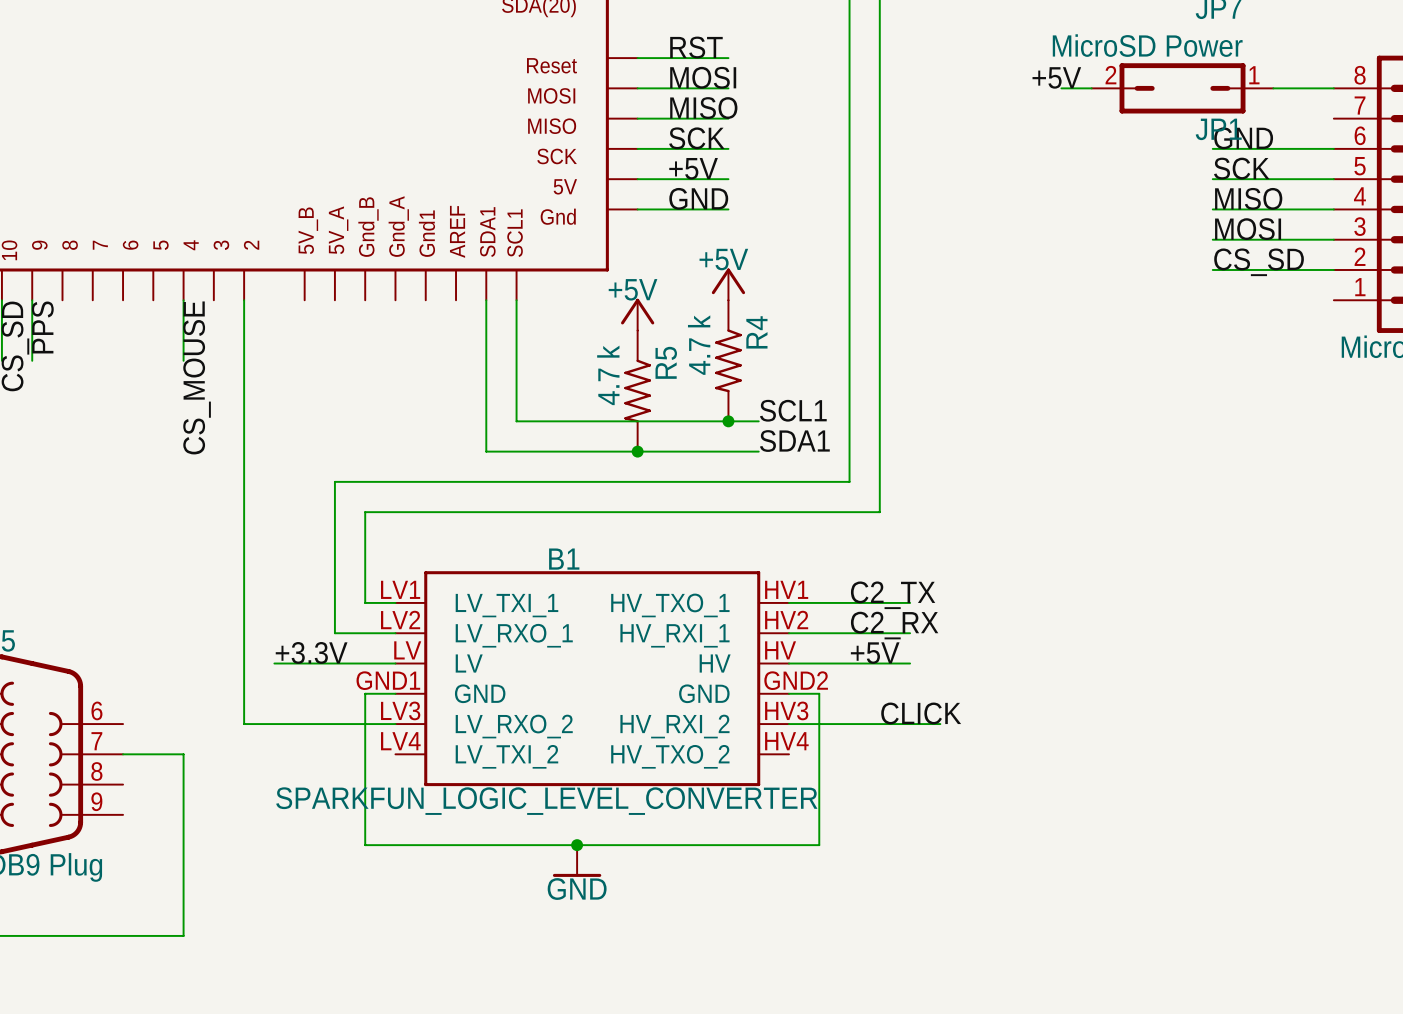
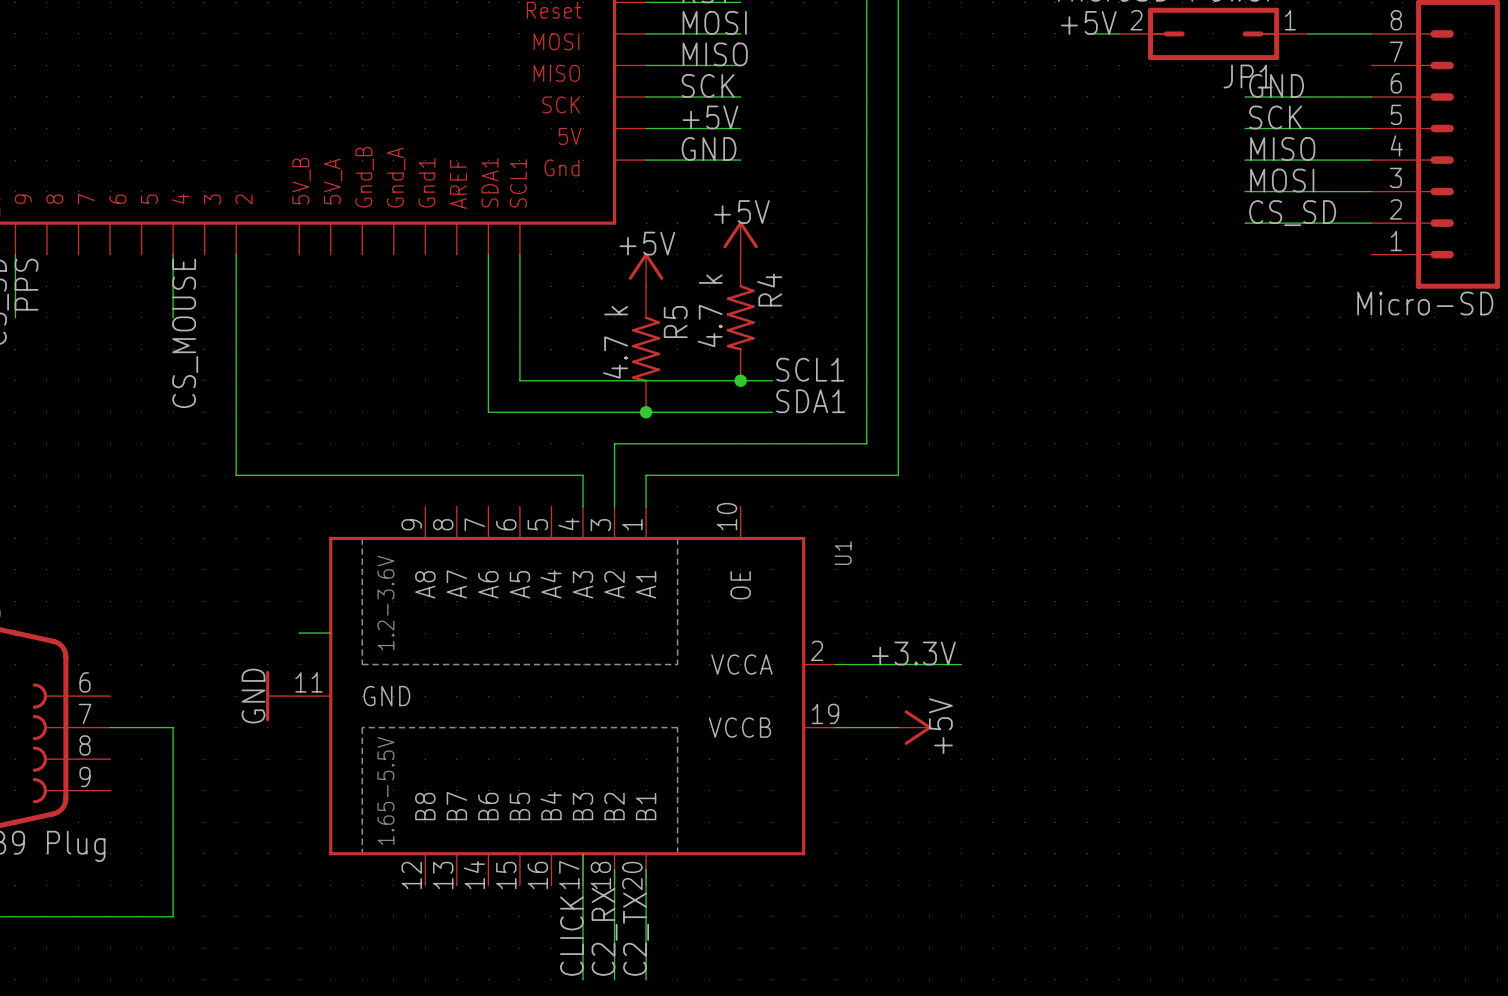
wire: (607, 481) (334, 481) (334, 633) (395, 633) -> (614, 443) (614, 506)
wire: (244, 512) (244, 724) (395, 724) -> none
wire: (365, 512) (365, 602) (395, 602) -> (362, 475) (236, 475)
wire: (577, 512) (637, 512) -> (583, 475) (583, 506)
wire: none -> (646, 475) (646, 506)
label: C2_TX (893, 595) -> none
wire: (788, 602) (910, 602) -> none
label: C2_RX (894, 625) -> none
wire: (788, 633) (910, 633) -> none
label: +3.3V (311, 652) -> none
label: +5V (875, 653) -> none
wire: (274, 663) (304, 663) -> none
wire: (334, 663) (395, 663) -> none
wire: (788, 663) (910, 663) -> (835, 664) (961, 664)
B1: SPARKFUN_LOGIC_LEVEL_CONVERTER (592, 678) -> none
label: none -> +3.3V (913, 653)
wire: (395, 693) (365, 693) (365, 845) (819, 845) (819, 693) (788, 693) -> none
label: CLICK (921, 713) -> none
power symbol: none -> GND (282, 696)
U1: none -> (567, 696)
wire: (788, 724) (940, 724) -> none
wire: none -> (835, 727) (898, 727)
power symbol: none -> +5V (914, 727)
junction: (577, 845) -> none
power symbol: GND (577, 861) -> none
wire: none -> (583, 853) (583, 979)
wire: none -> (614, 869) (614, 979)
wire: none -> (646, 869) (646, 979)
label: none -> C2_RX (604, 931)
label: none -> C2_TX (636, 934)
label: none -> CLICK (571, 936)

